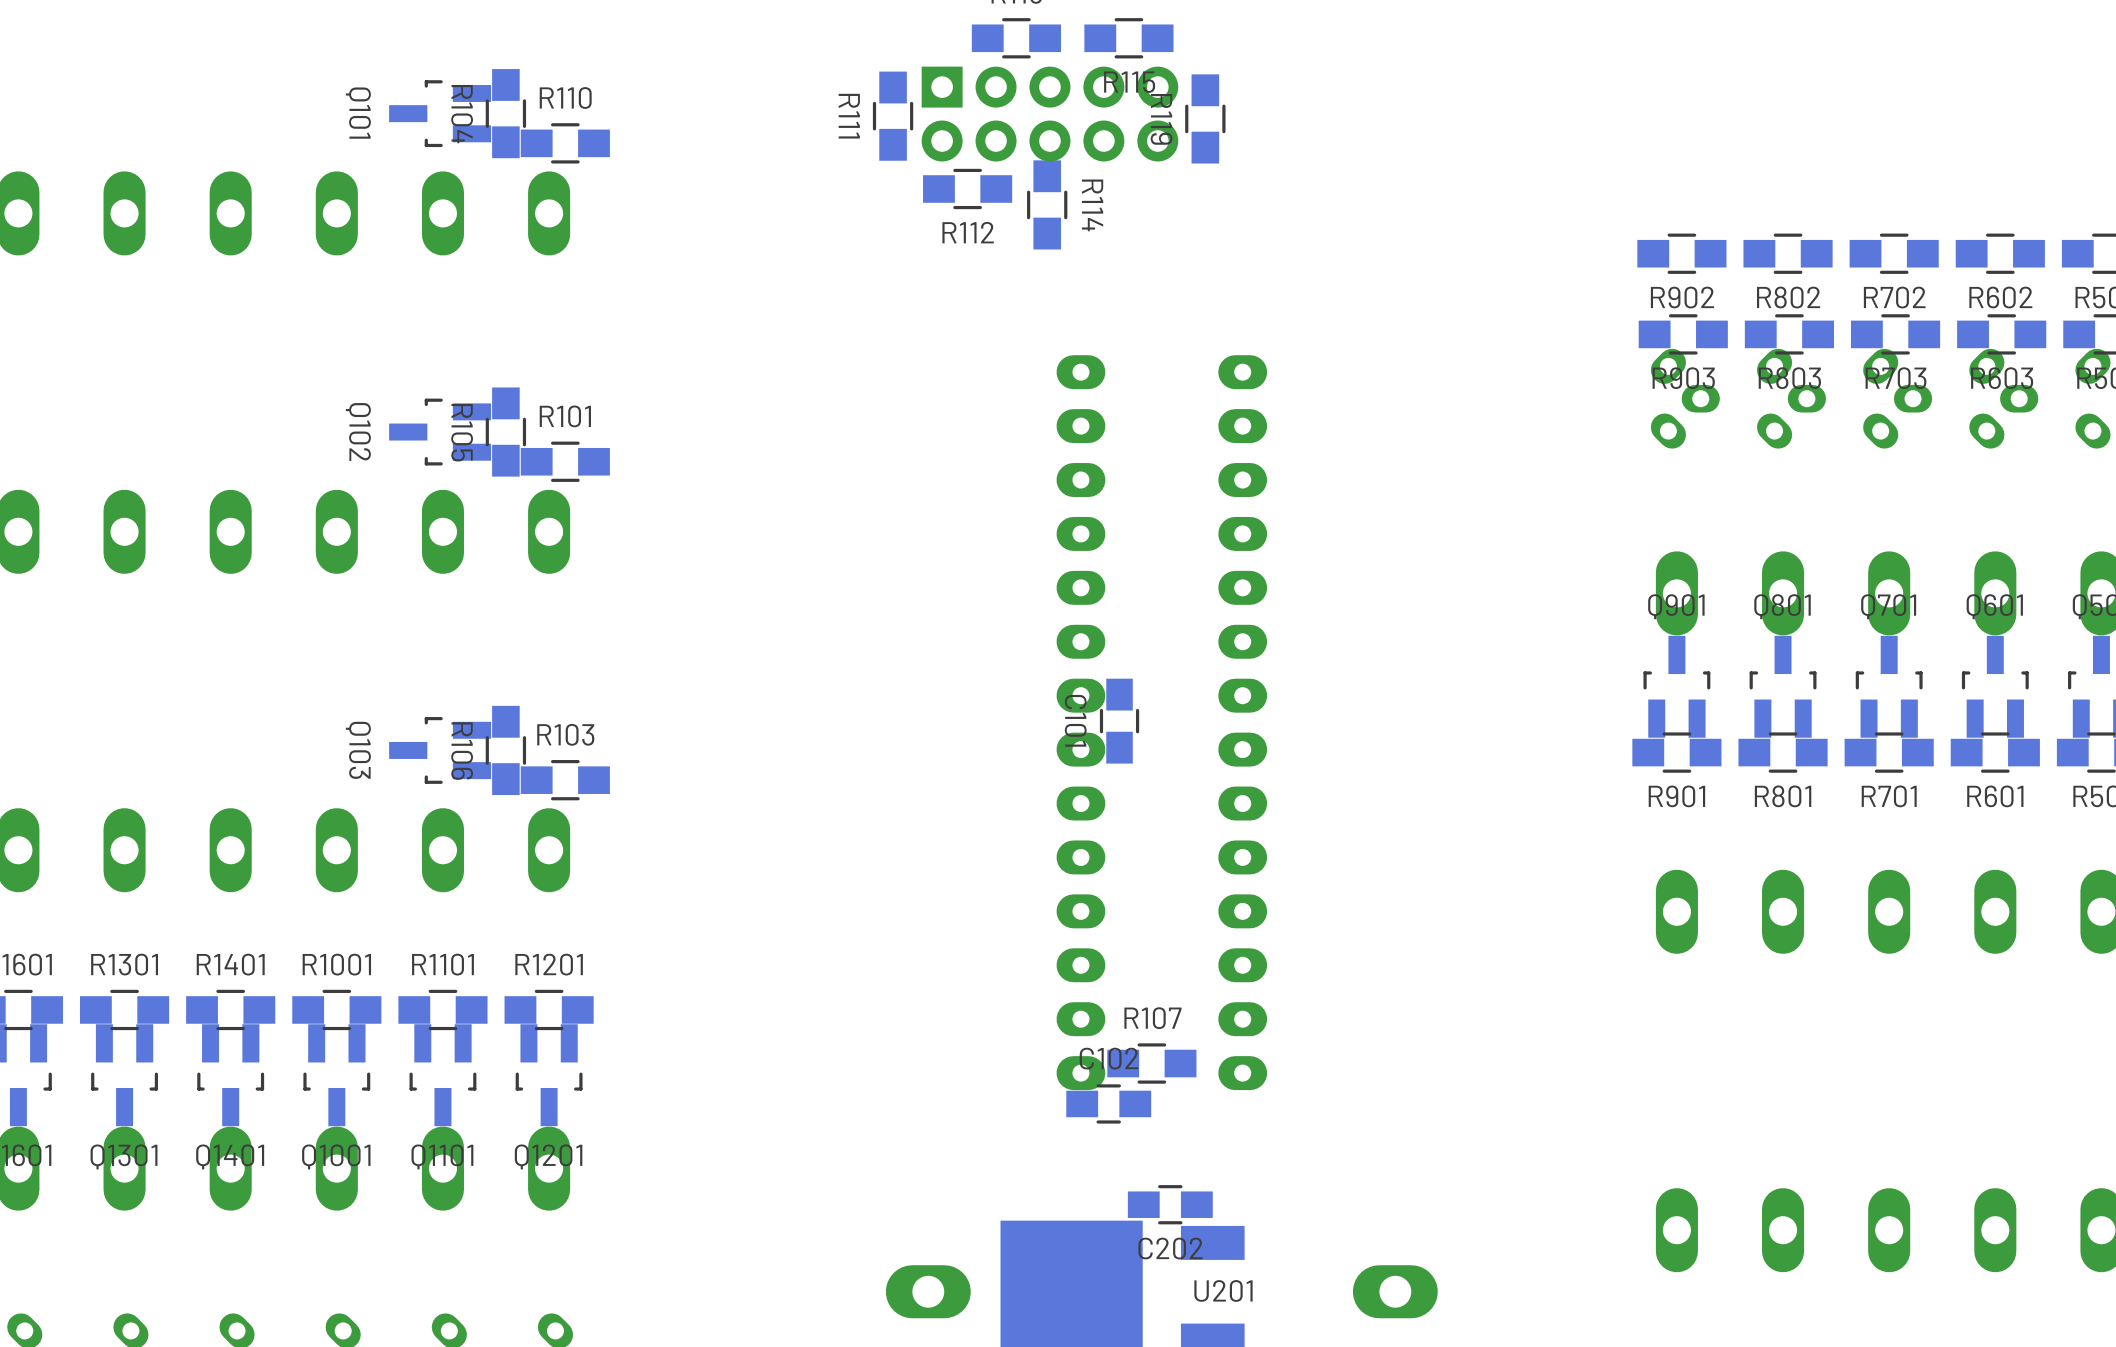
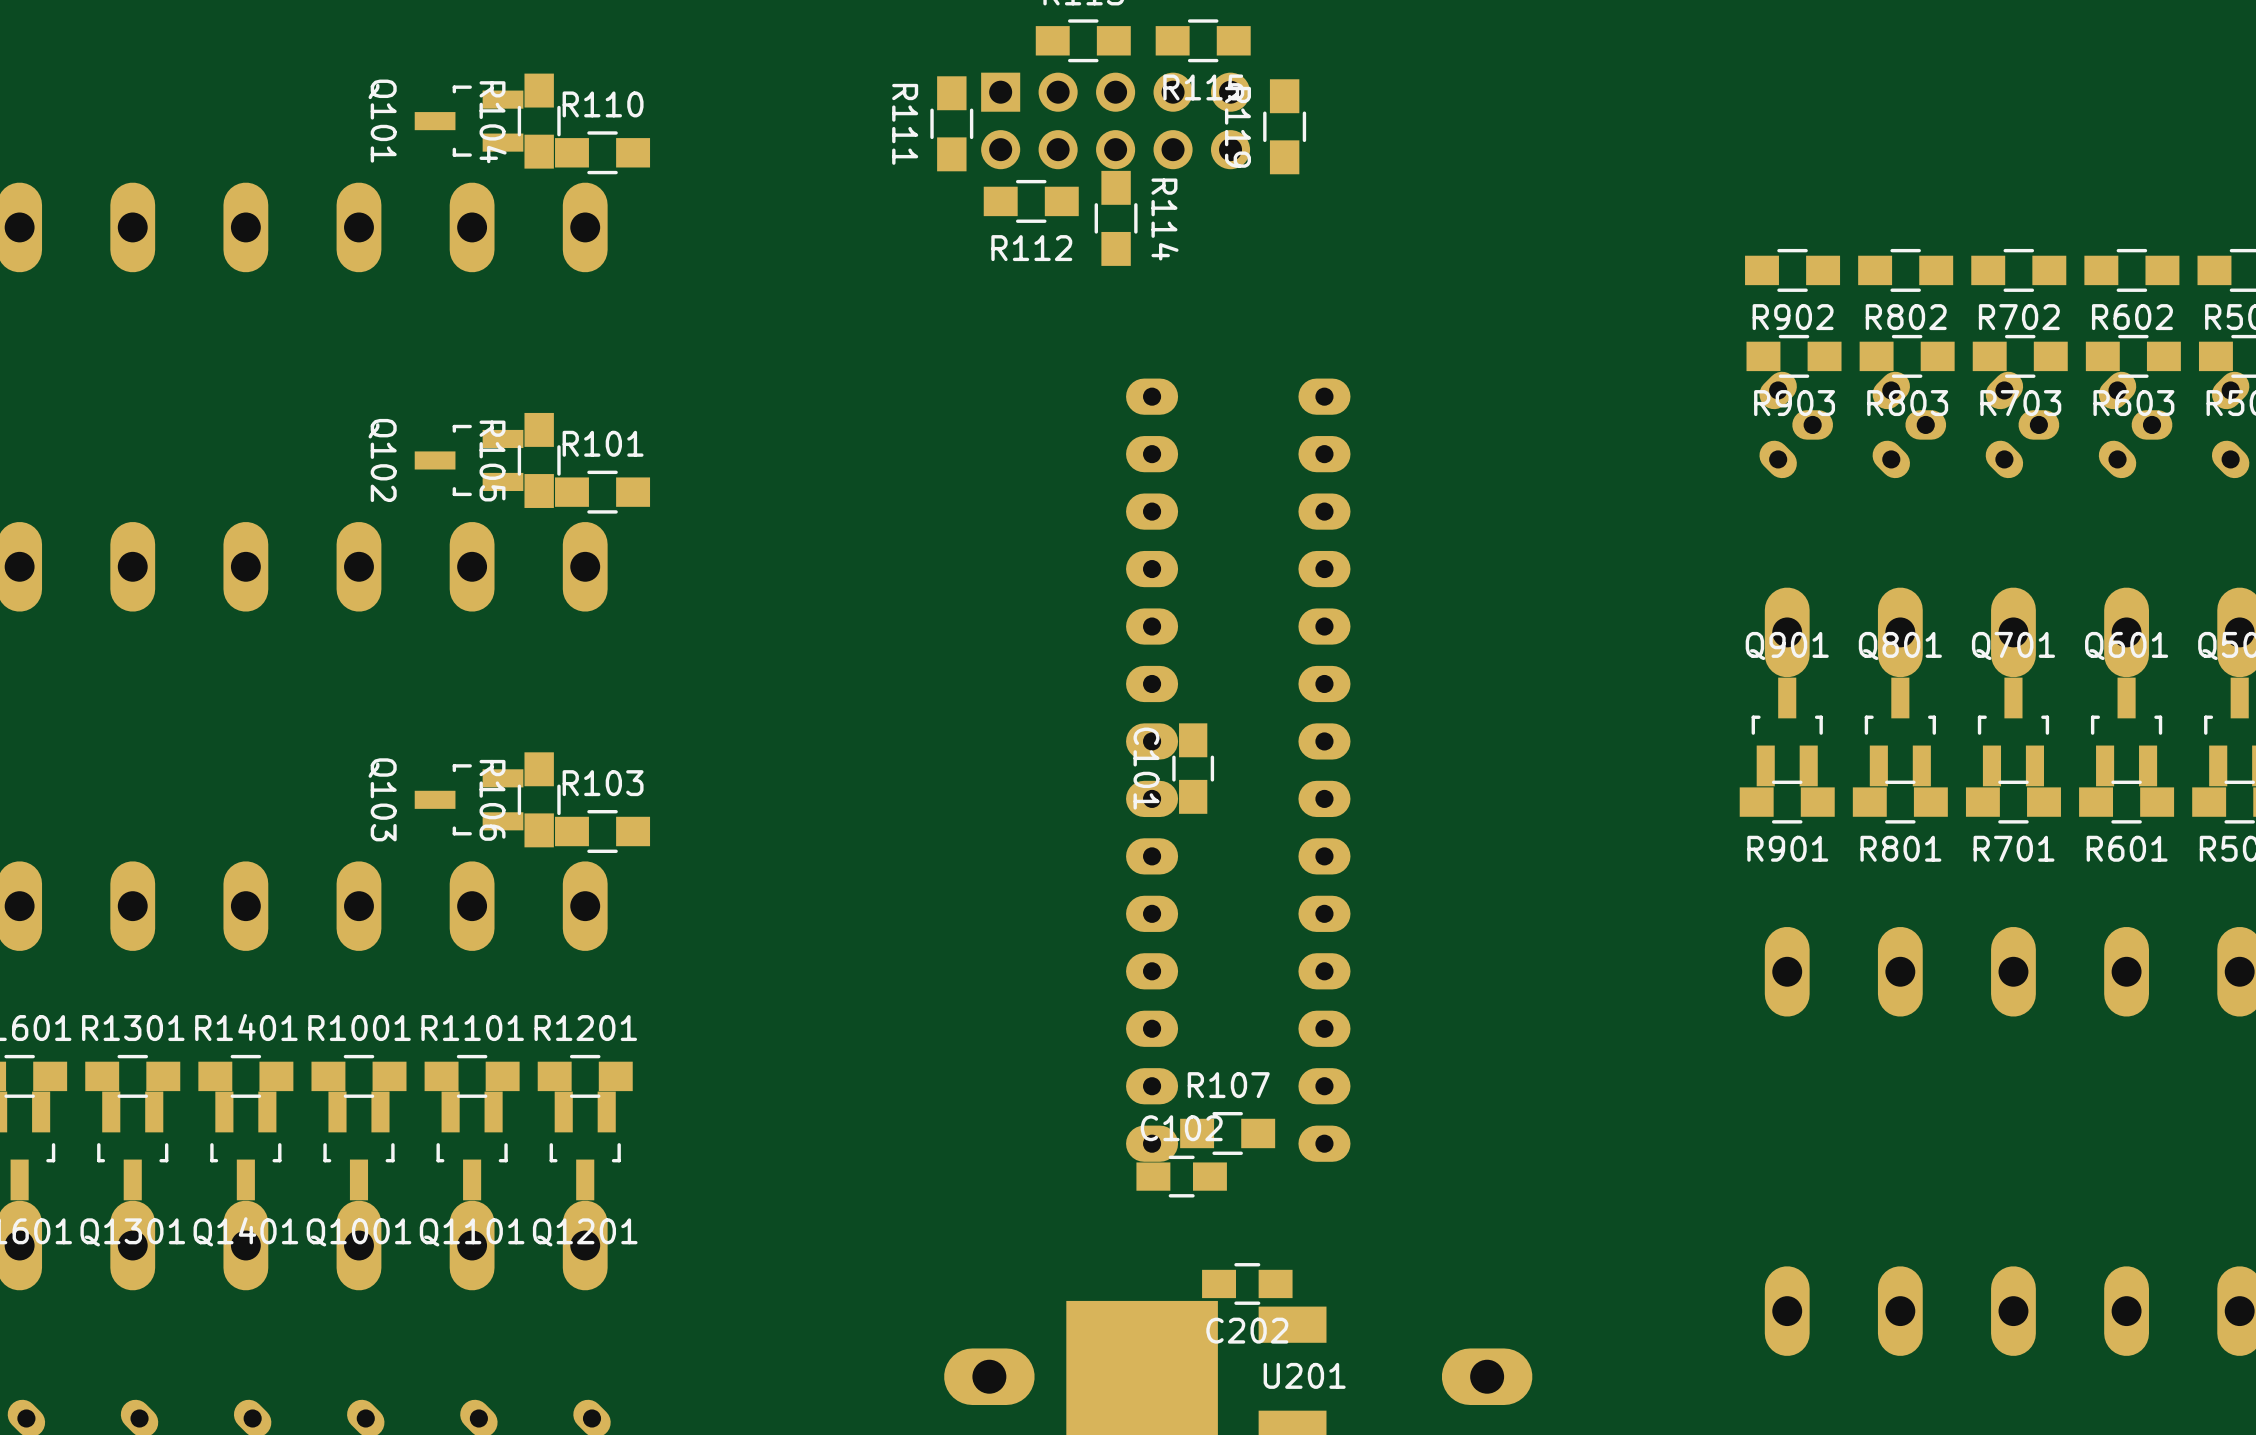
part footprint: [921, 66, 1179, 162] -> [981, 72, 1251, 170]

